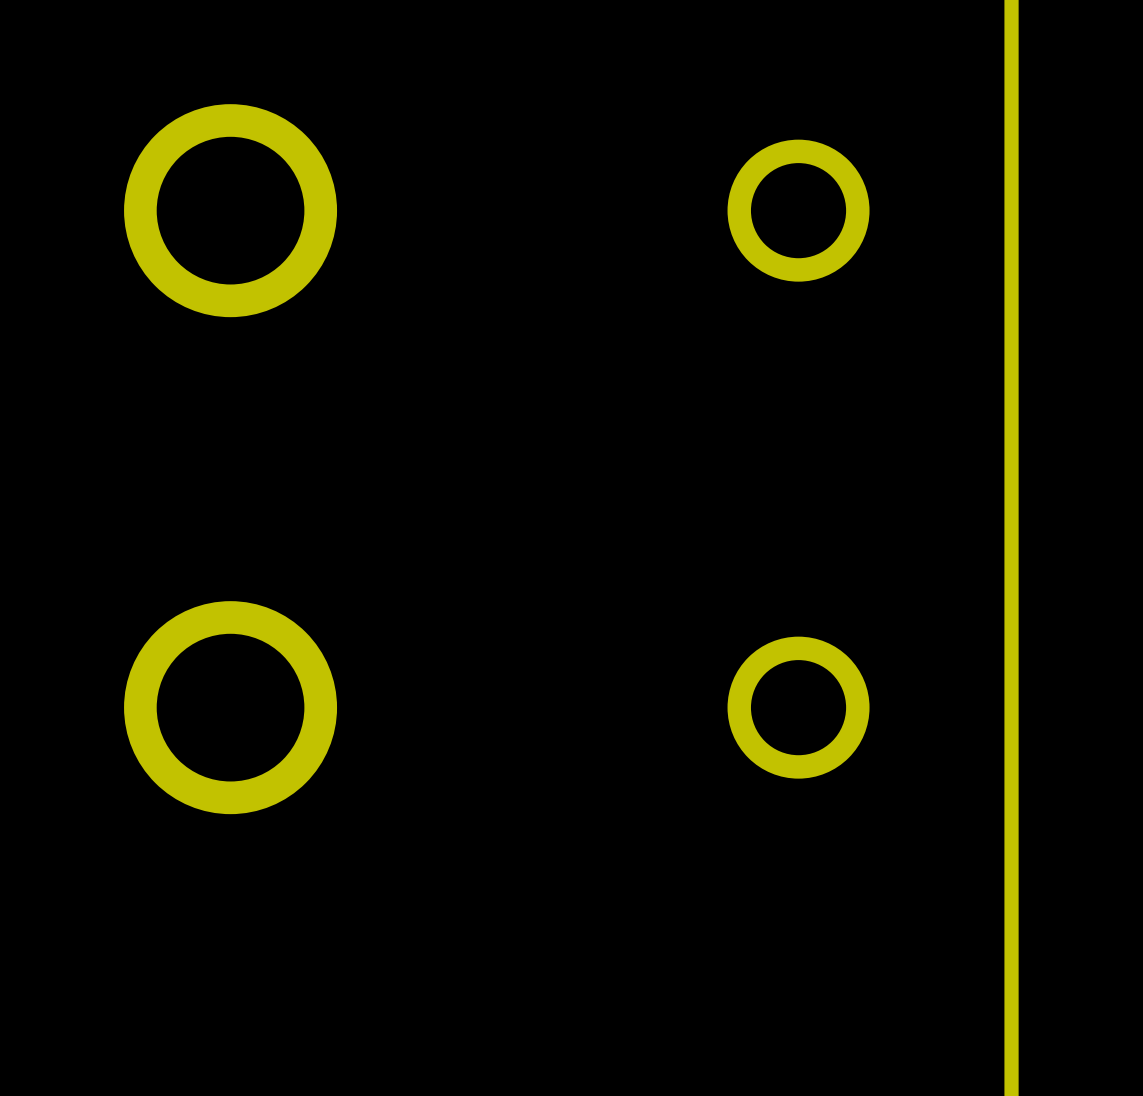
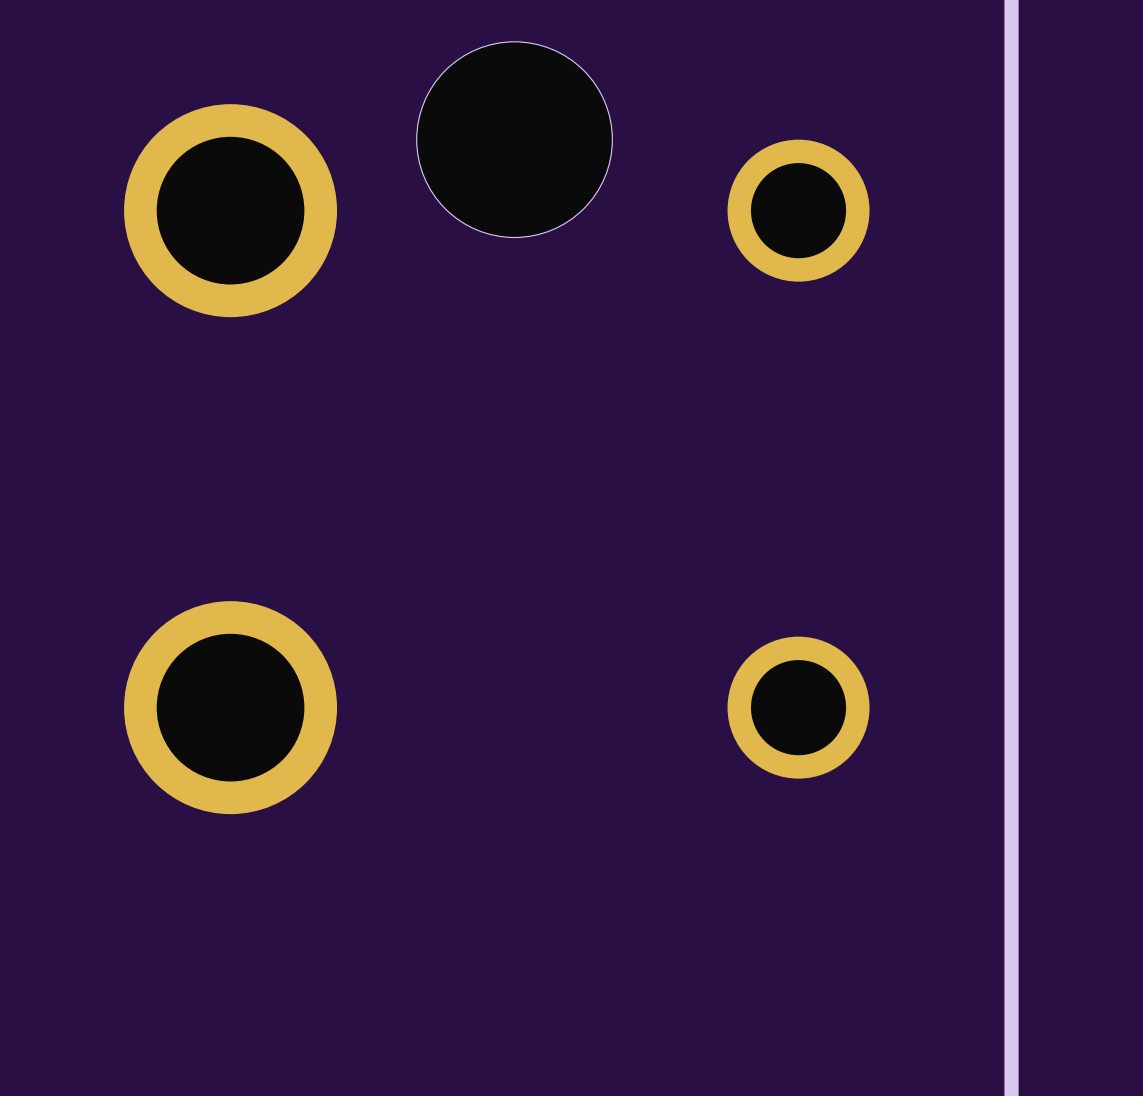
part: none -> (514, 139)

